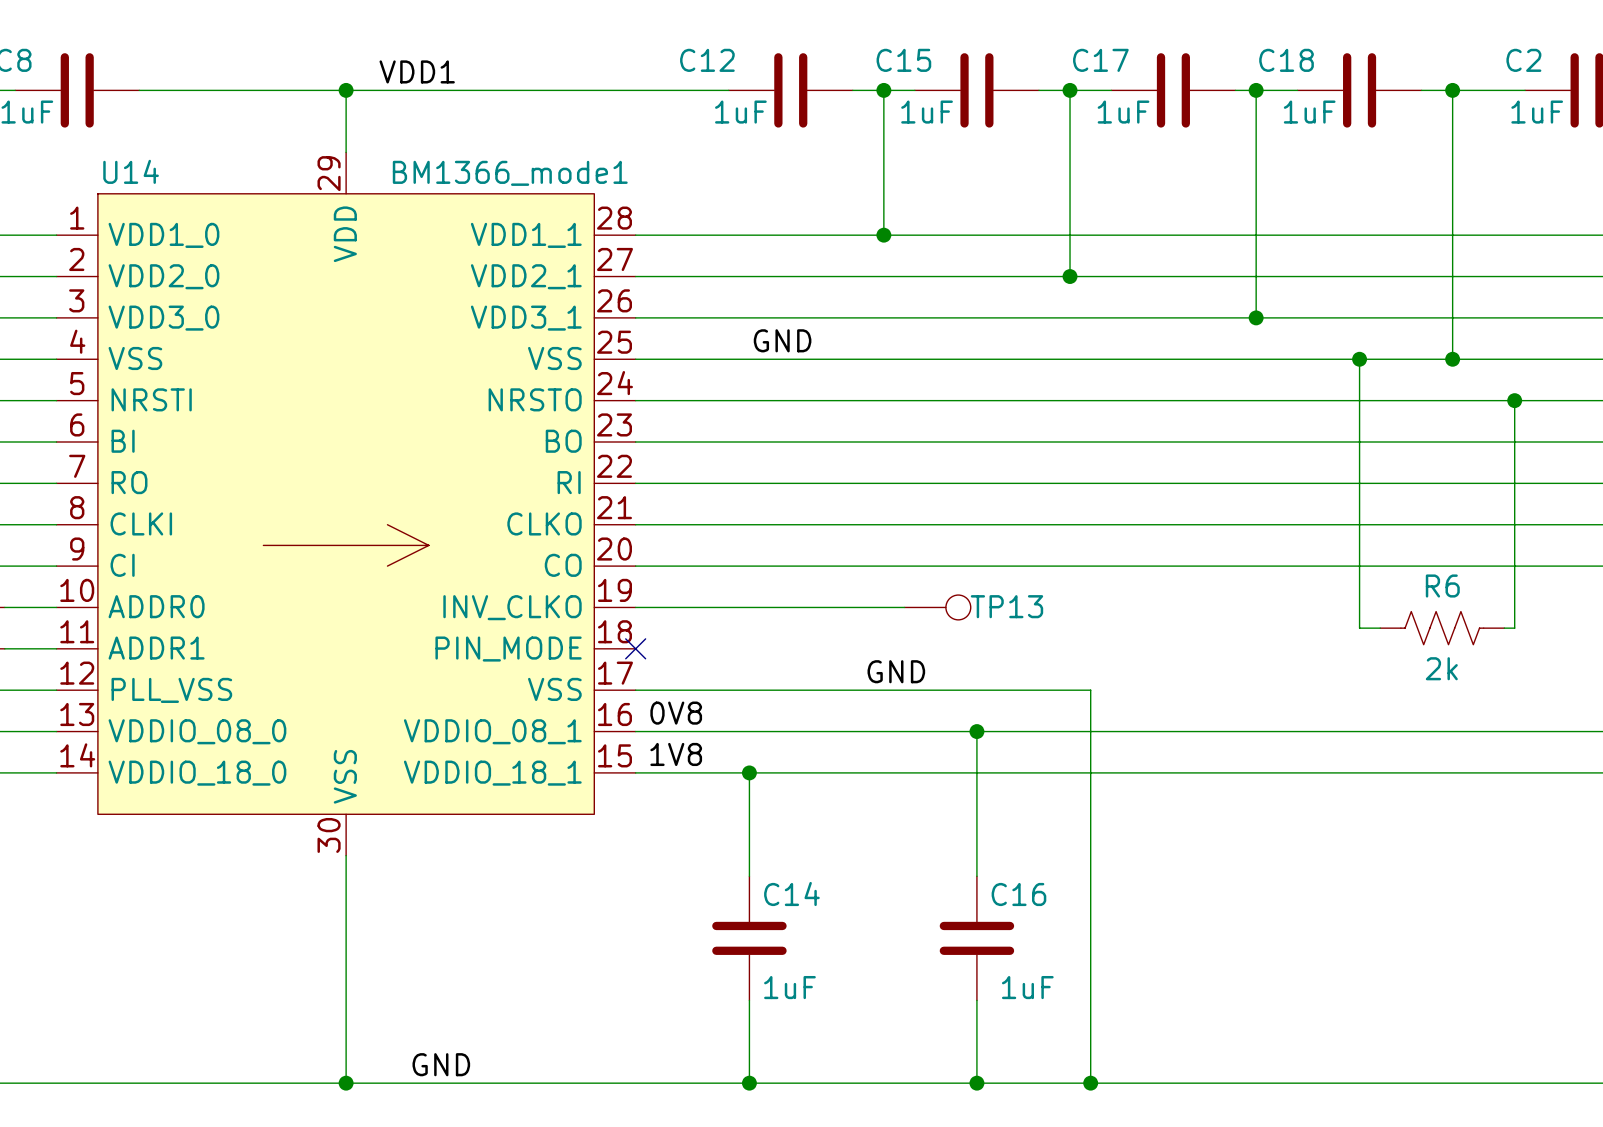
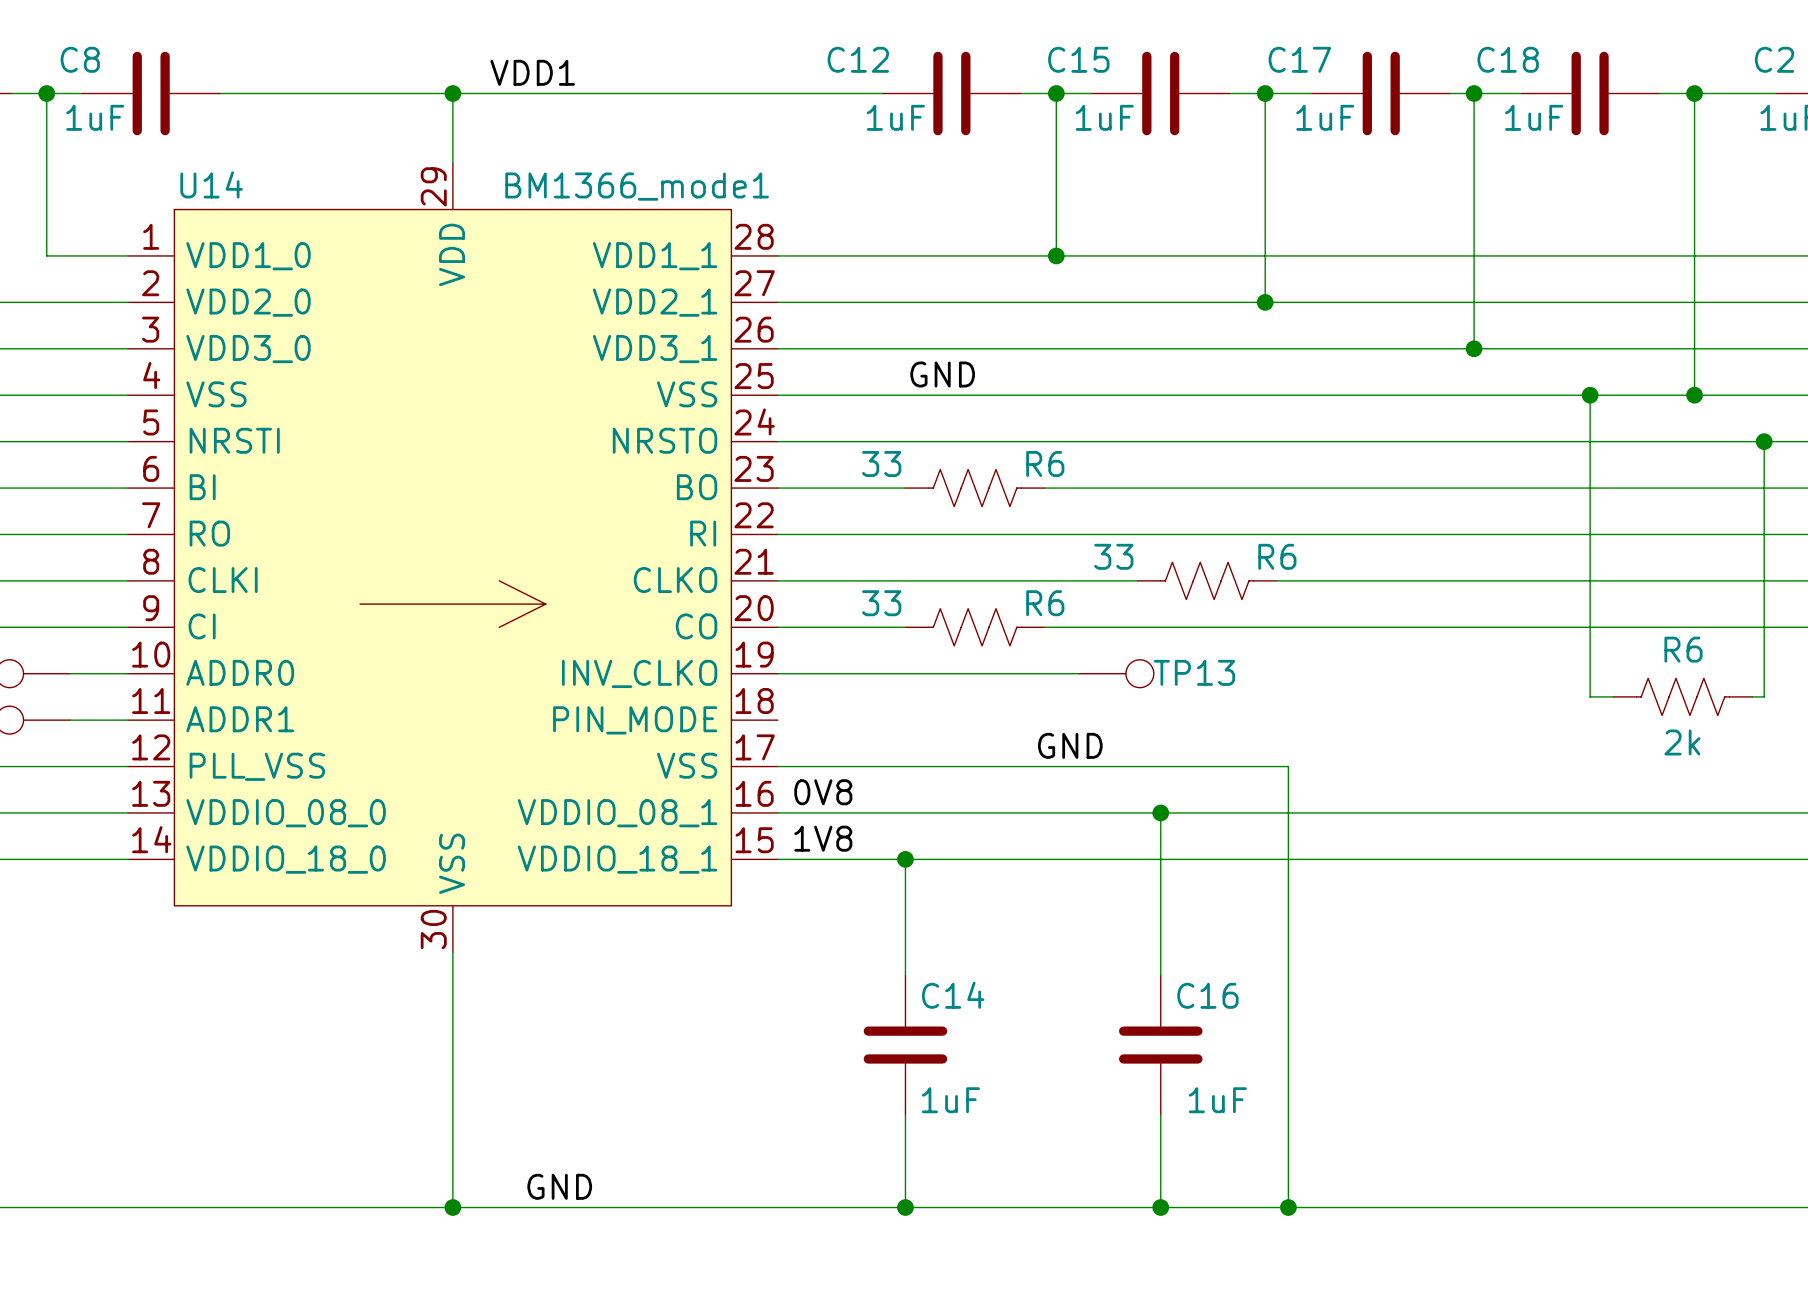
wire: (749, 442) (873, 442) -> none
R6: none -> 33 (975, 488)
wire: (956, 524) (1080, 524) -> none
R6: none -> 33 (1207, 580)
wire: (749, 566) (873, 566) -> none
R6: none -> 33 (975, 627)
no-connect mark: (635, 648) -> none

